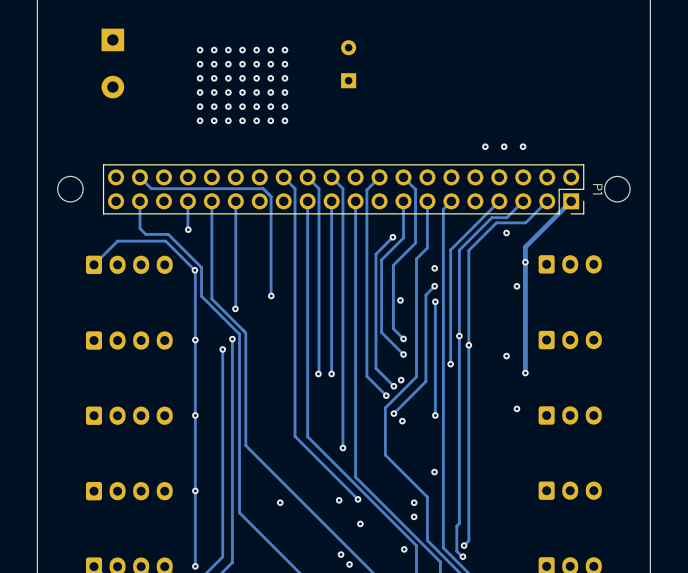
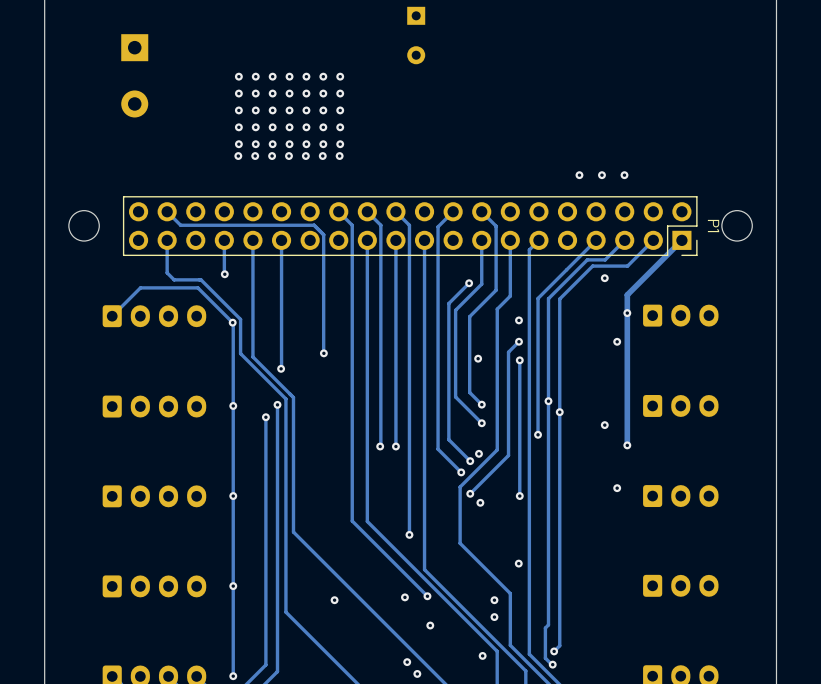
via: (200, 50) -> none
via: (214, 50) -> none
via: (228, 50) -> none
via: (242, 50) -> none
via: (256, 50) -> none
via: (270, 50) -> none
via: (284, 50) -> none
part rotation: 0° (348, 64) -> 180° (416, 35)
part position: (348, 64) -> (416, 35)
via: none -> (238, 156)
via: none -> (255, 156)
via: none -> (272, 156)
via: none -> (288, 156)
via: none -> (305, 156)
via: none -> (322, 156)
via: none -> (339, 156)

